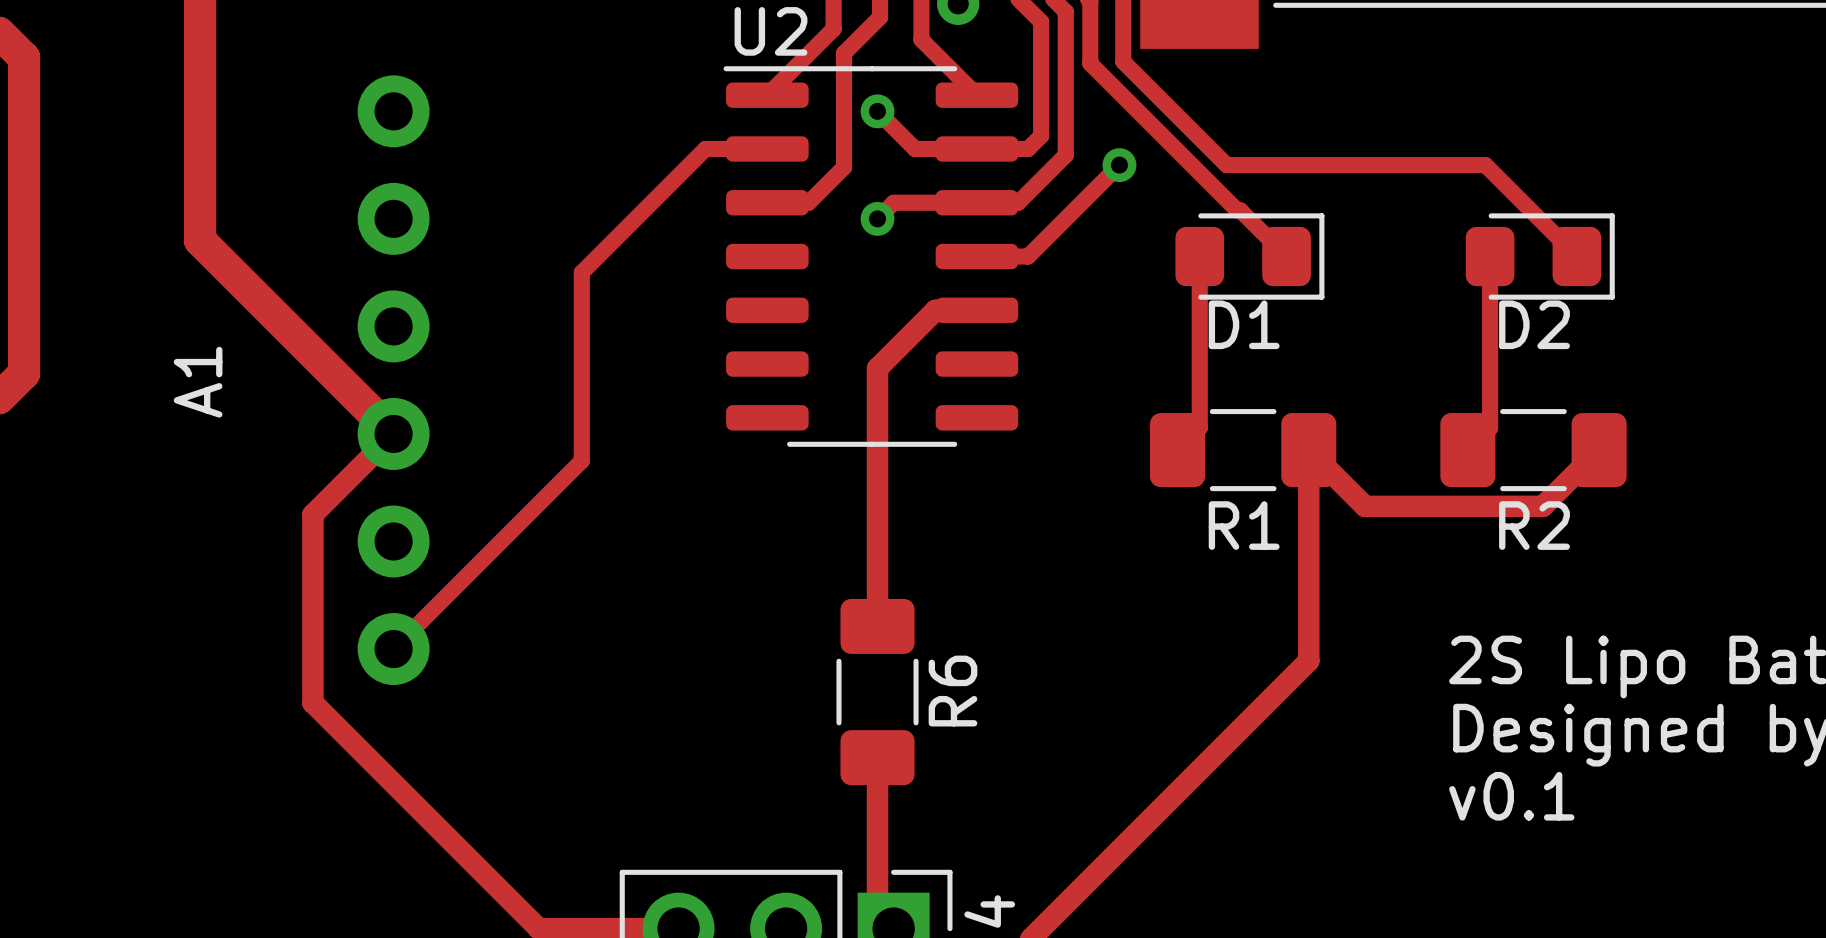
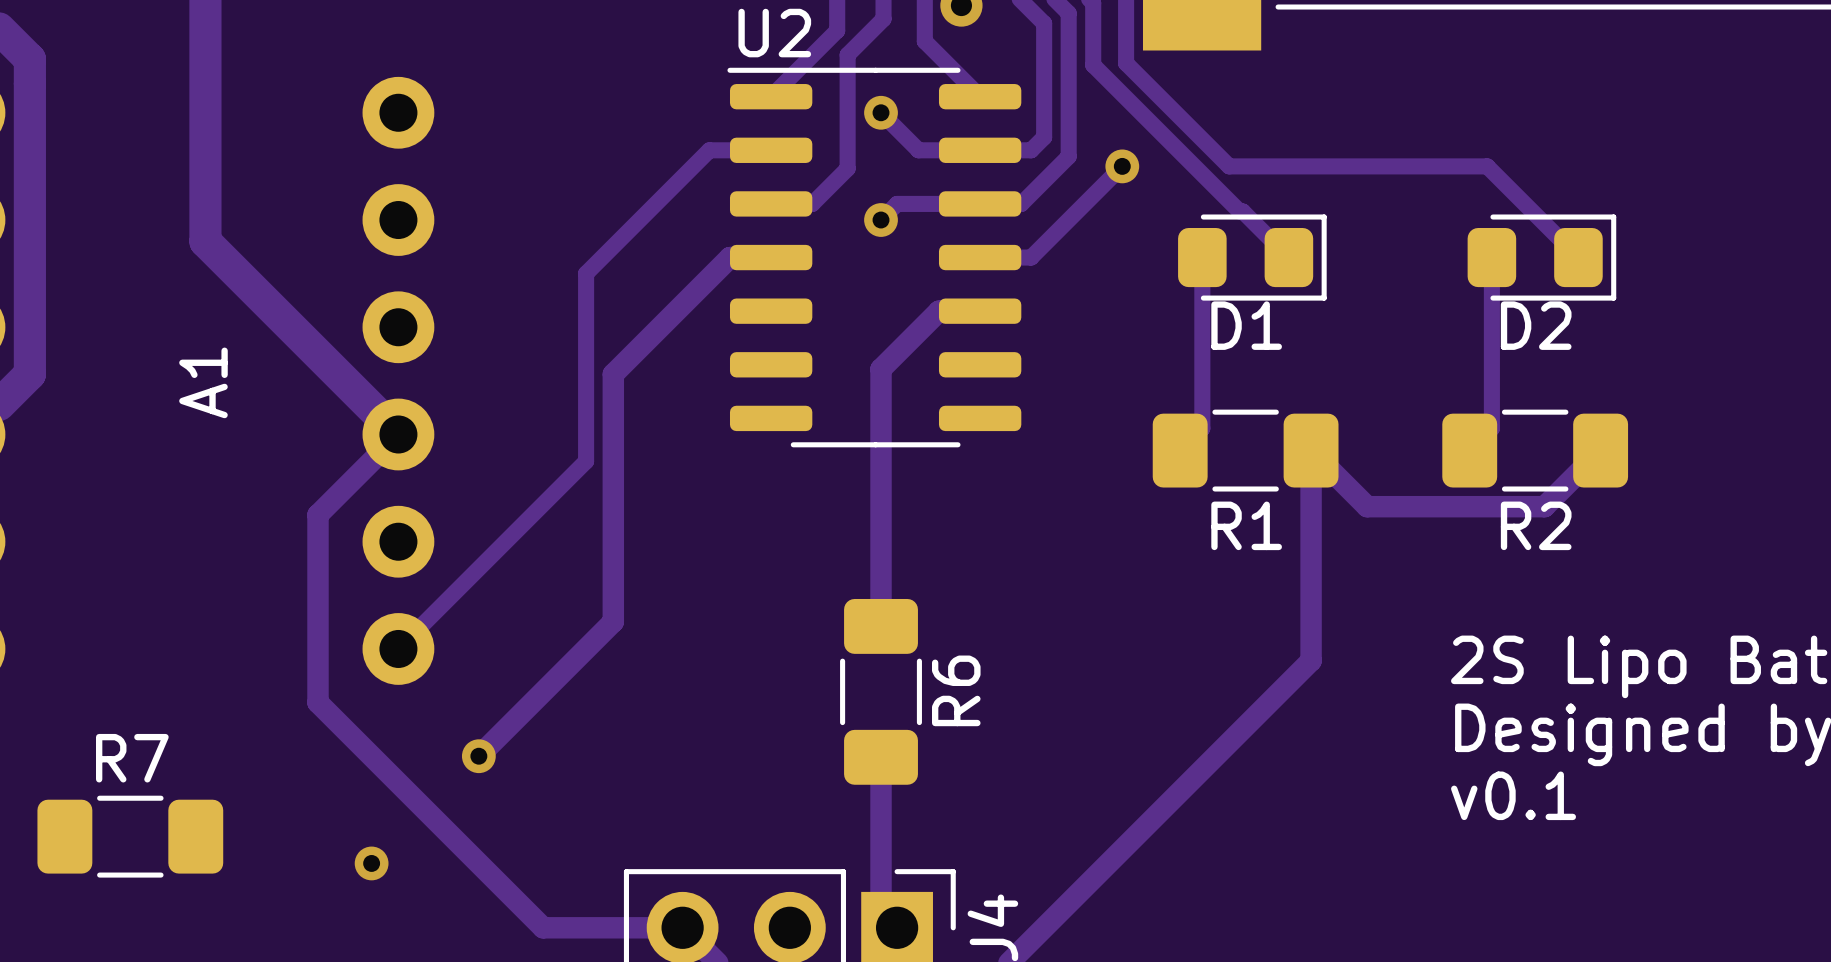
track: none -> (771, 257) (729, 257) (613, 374) (613, 621) (478, 756)
via: none -> (478, 756)
R7: none -> (130, 836)
via: none -> (371, 863)

